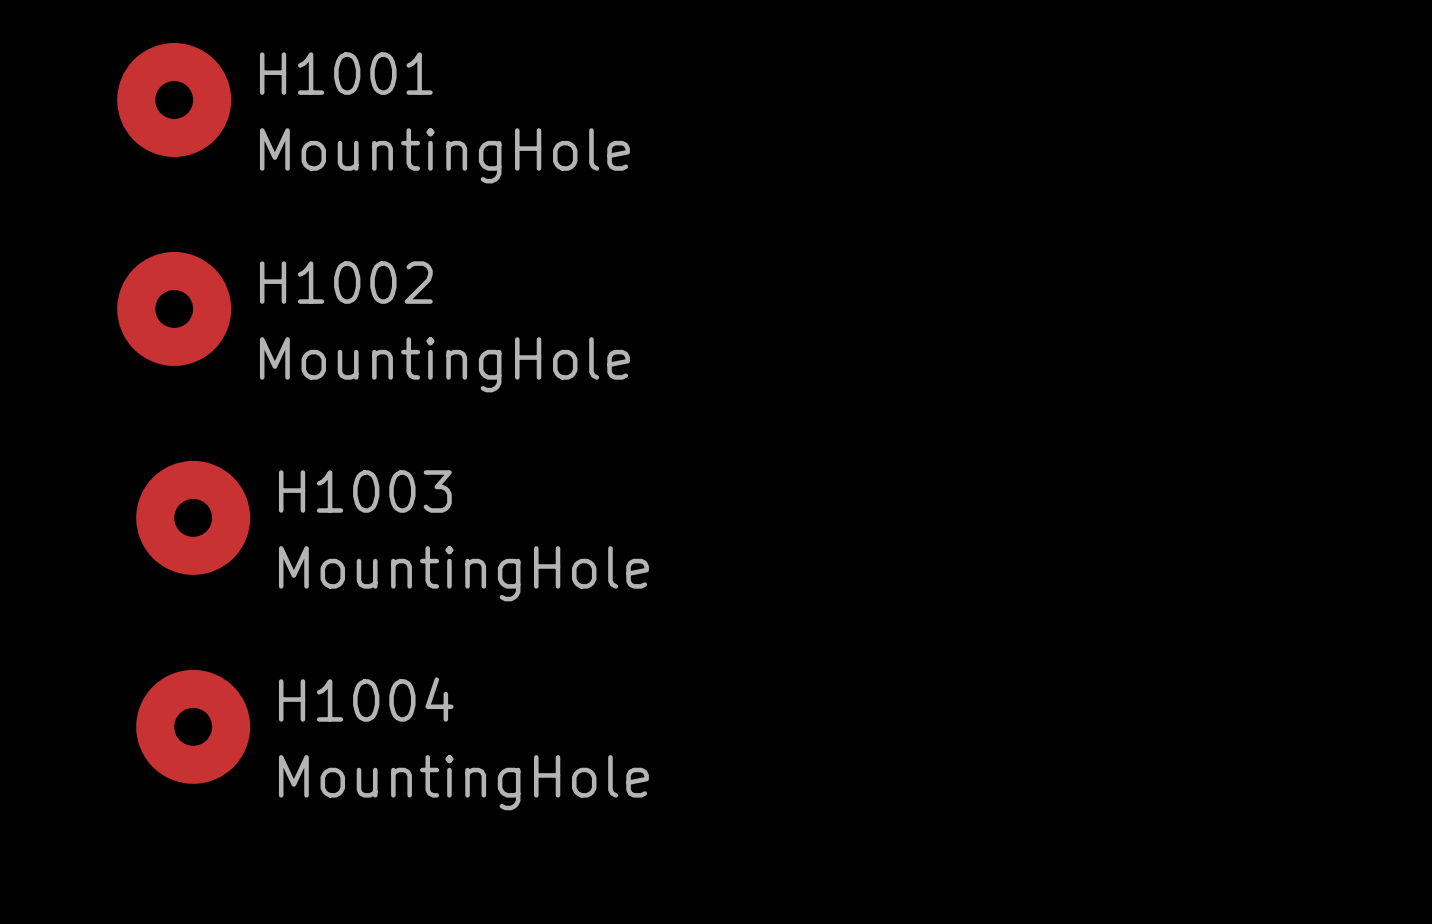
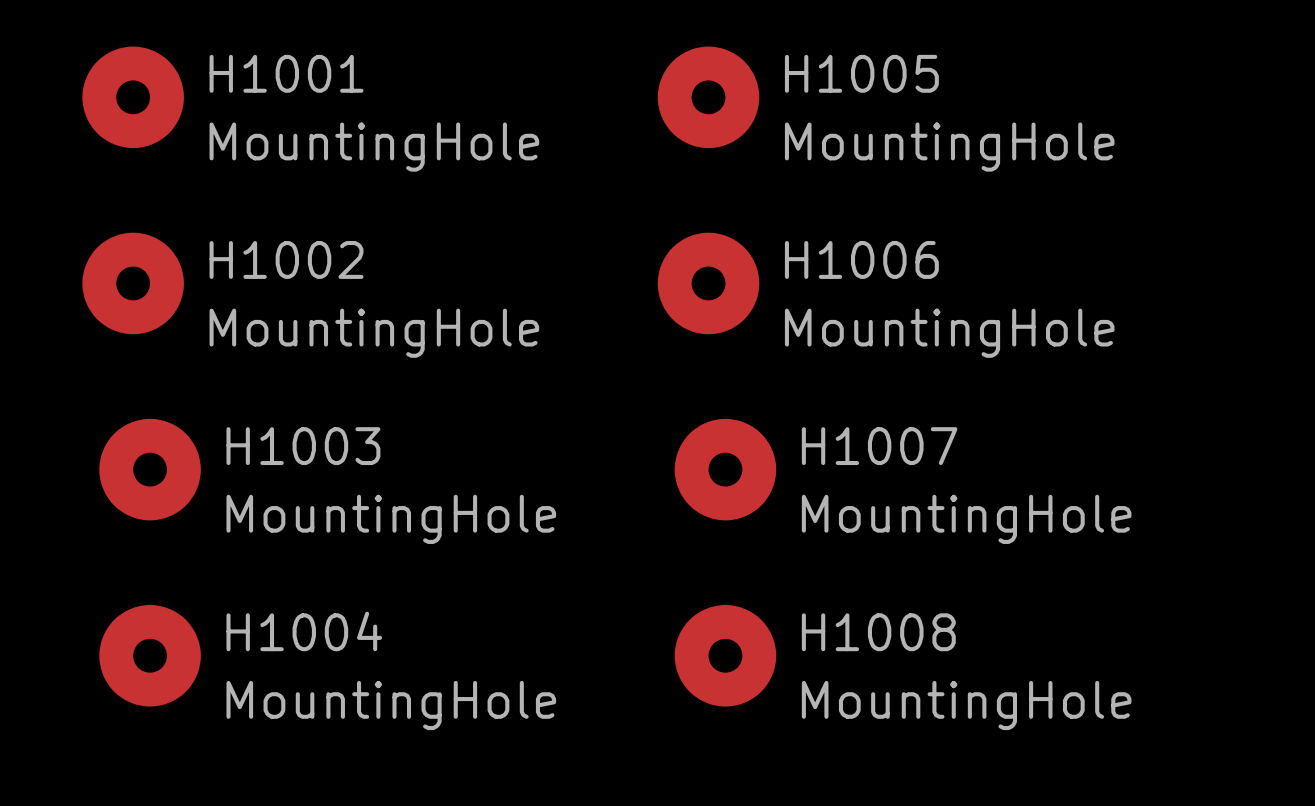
H1005: none -> MountingHole (708, 97)
H1006: none -> MountingHole (708, 283)
H1007: none -> MountingHole (725, 469)
H1008: none -> MountingHole (725, 655)

